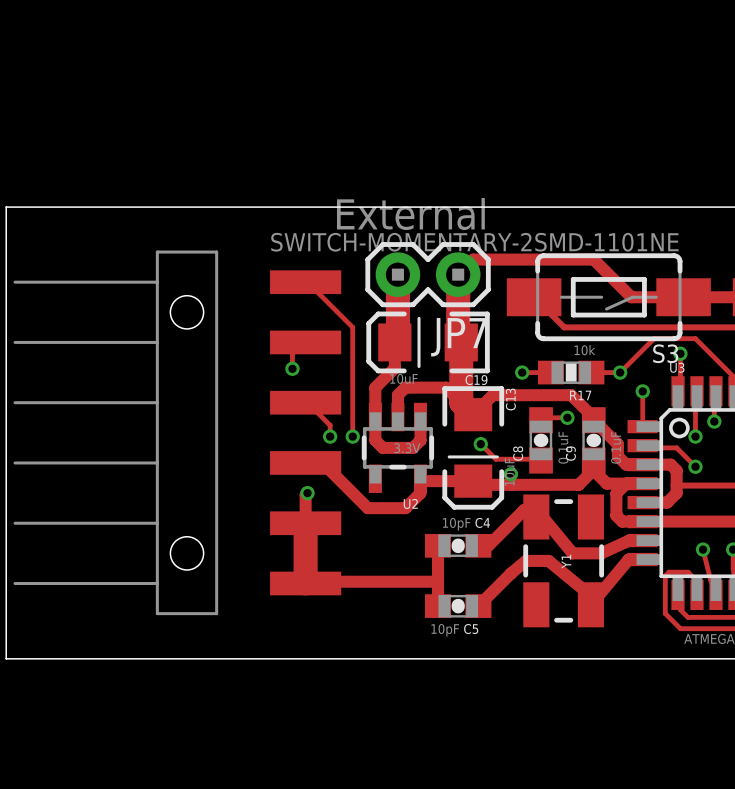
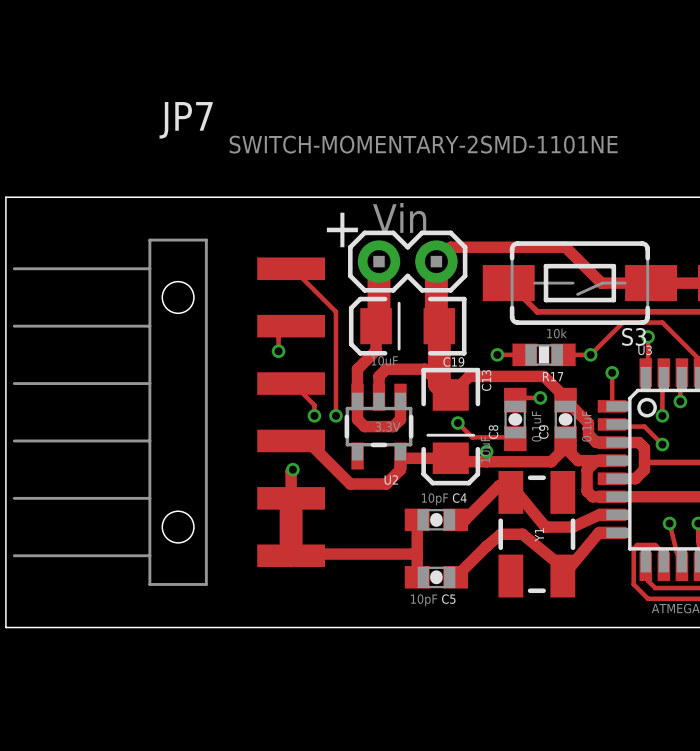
JP7 value: External (410, 214) -> Vin (399, 217)
text: none -> + (342, 229)
S3 value position: SWITCH-MOMENTARY-2SMD-1101NE (474, 242) -> SWITCH-MOMENTARY-2SMD-1101NE (423, 144)
JP7 name position: JP7 (459, 337) -> JP7 (186, 120)

